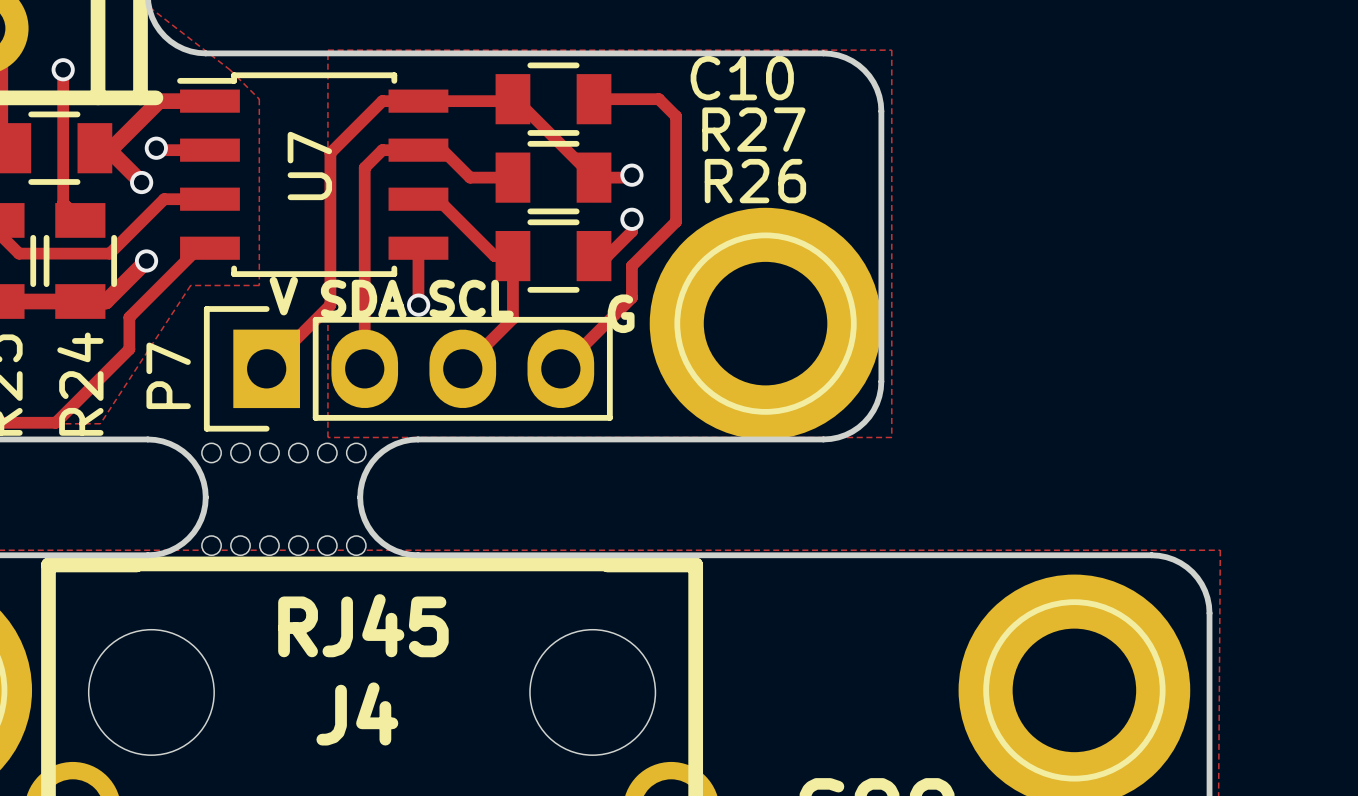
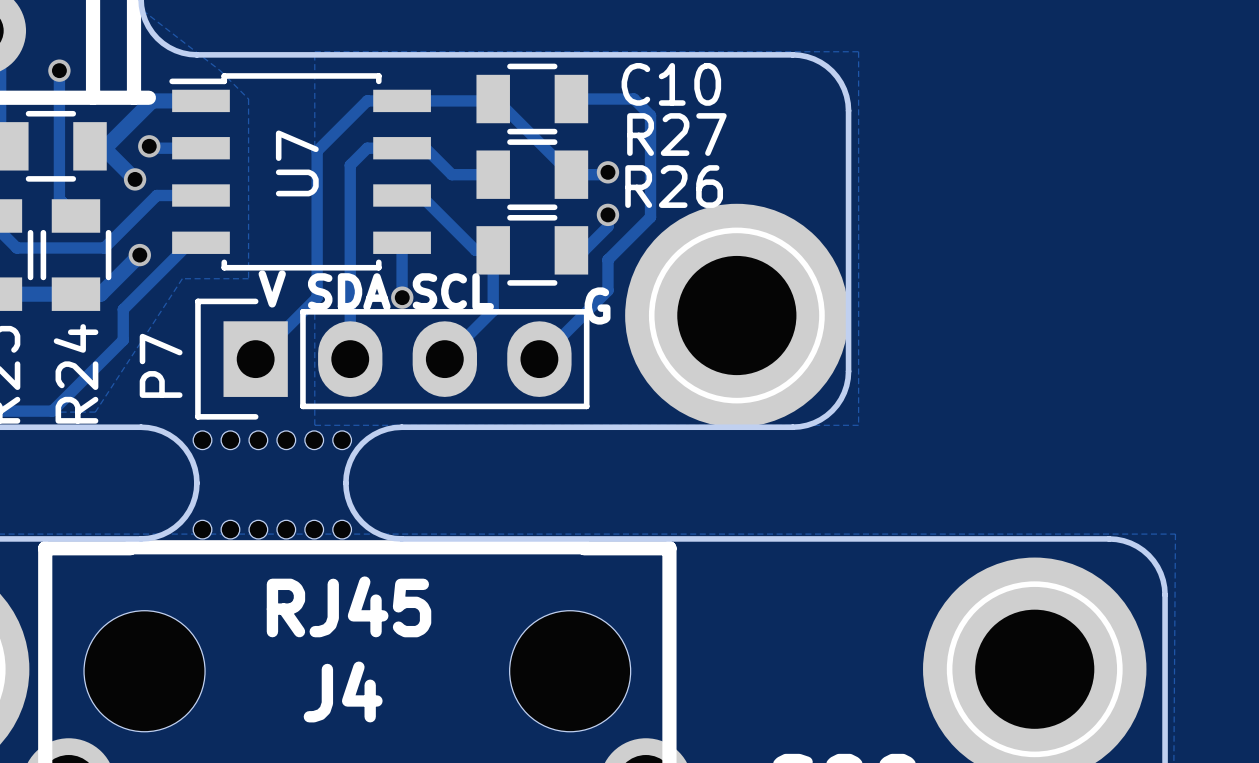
C10 name position: C10 (742, 78) -> C10 (671, 84)
R27 name position: R27 (753, 129) -> R27 (676, 134)
R26 name position: R26 (755, 181) -> R26 (674, 186)

